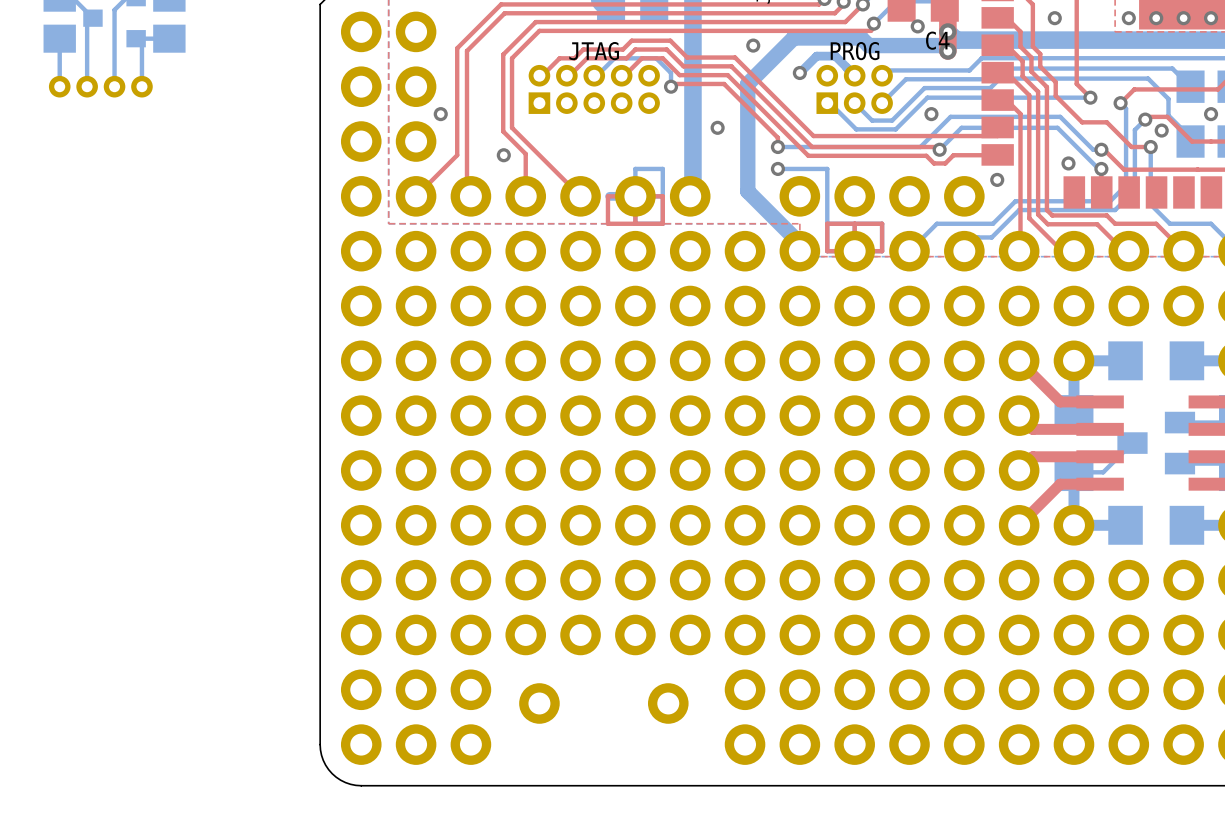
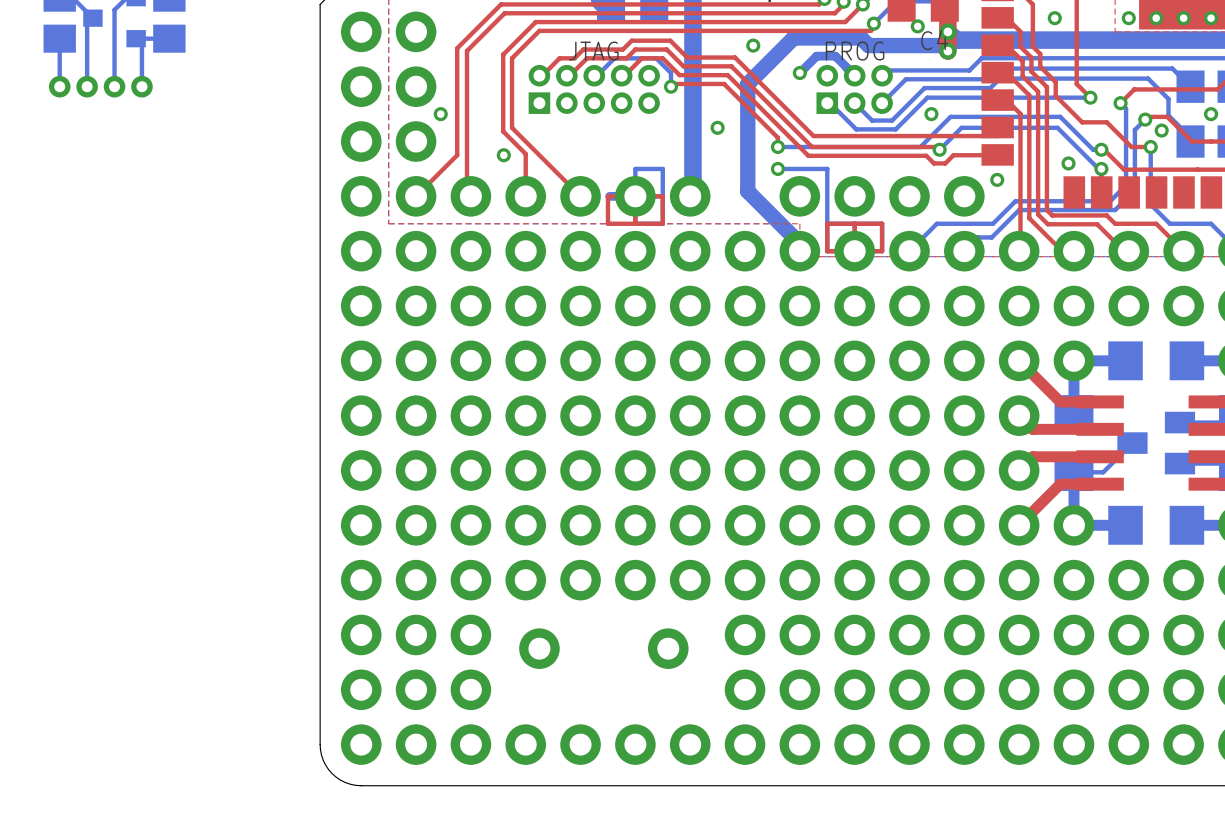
part footprint: [340, 614, 985, 656] -> [647, 628, 689, 669]
part position: (539, 703) -> (539, 648)
part: (668, 703) -> none
part: none -> (662, 744)

